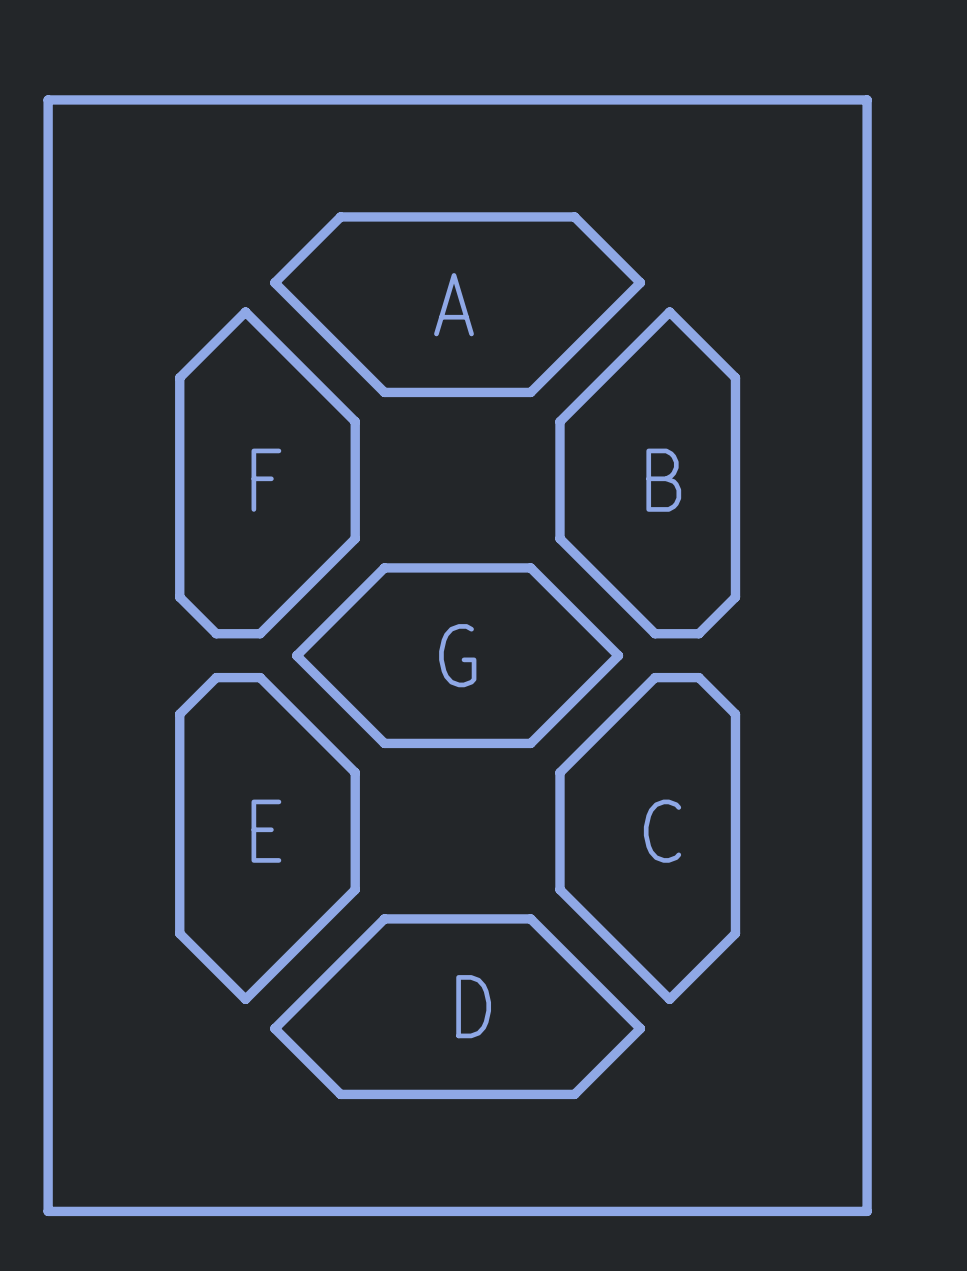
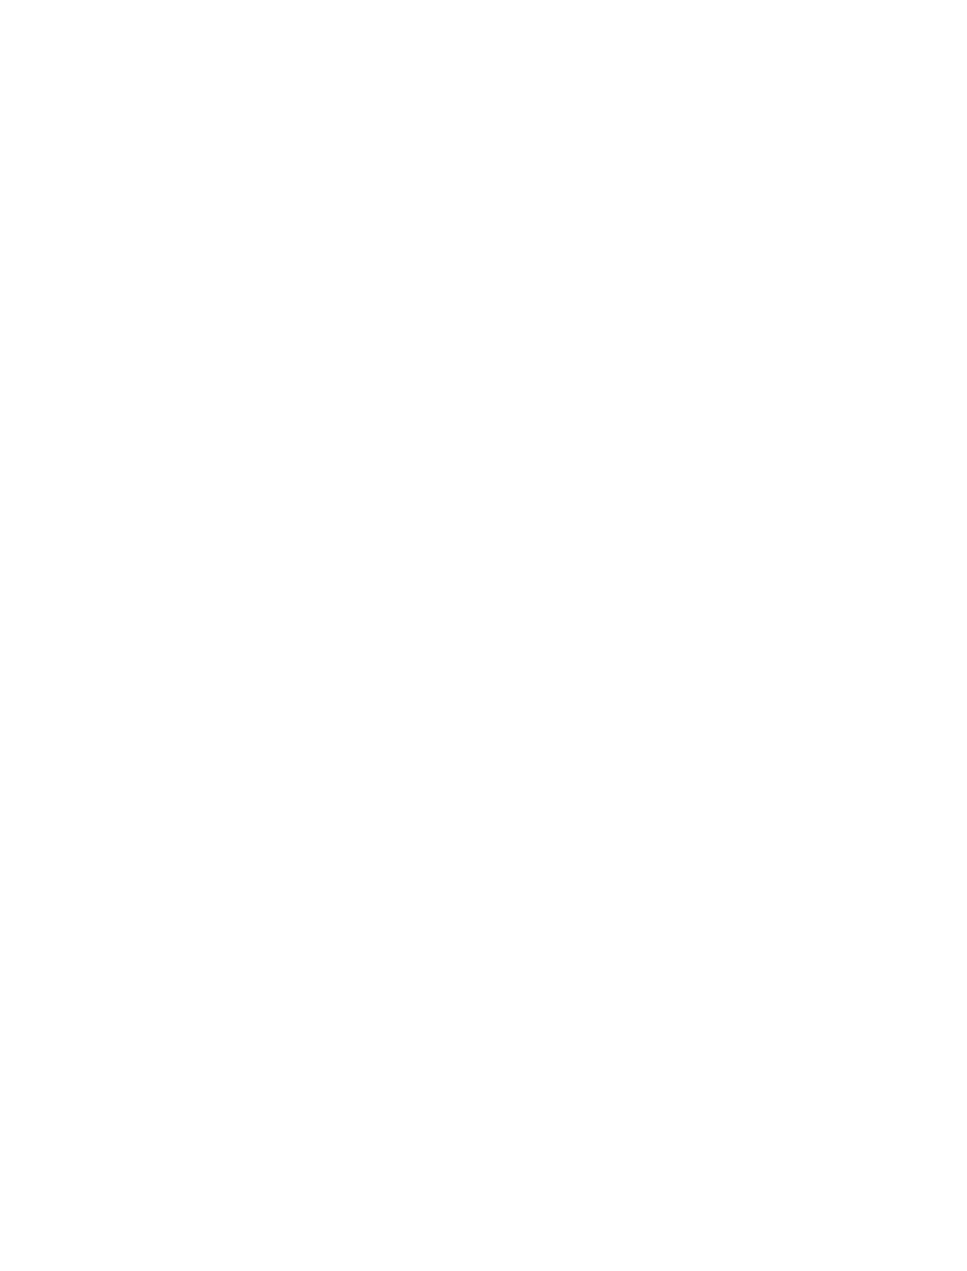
line: (48, 99) (48, 1211) (867, 1211) (867, 99) (48, 99) -> none
line: (340, 216) (274, 282) (384, 392) (530, 392) (640, 282) (574, 216) (340, 216) -> none
text: A (454, 304) -> none
line: (245, 312) (179, 377) (179, 597) (216, 633) (260, 633) (355, 538) (355, 421) (245, 312) -> none
line: (669, 312) (735, 377) (735, 597) (698, 633) (655, 633) (559, 538) (559, 421) (669, 312) -> none
text: F (266, 480) -> none
text: B (663, 480) -> none
line: (384, 567) (296, 655) (384, 743) (530, 743) (618, 655) (530, 567) (384, 567) -> none
text: G (457, 655) -> none
line: (216, 677) (260, 677) (355, 772) (355, 889) (245, 999) (179, 933) (179, 714) (216, 677) -> none
line: (655, 677) (698, 677) (735, 714) (735, 933) (669, 999) (559, 889) (559, 772) (655, 677) -> none
text: E (266, 831) -> none
text: C (662, 831) -> none
line: (384, 918) (530, 918) (640, 1028) (574, 1094) (340, 1094) (274, 1028) (384, 918) -> none
text: D (473, 1006) -> none

